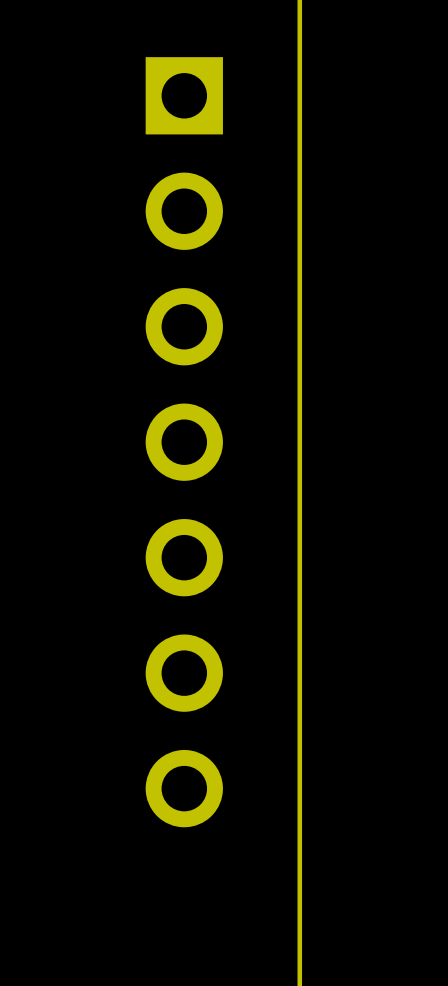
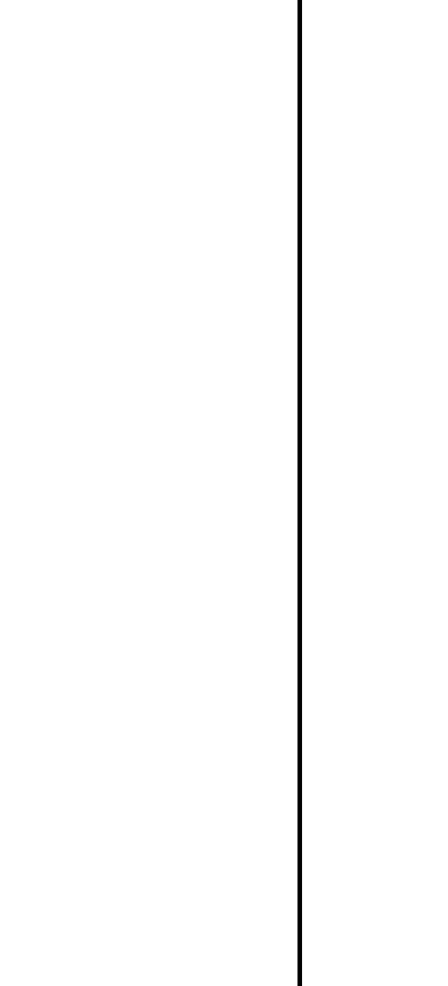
part: (184, 442) -> none

